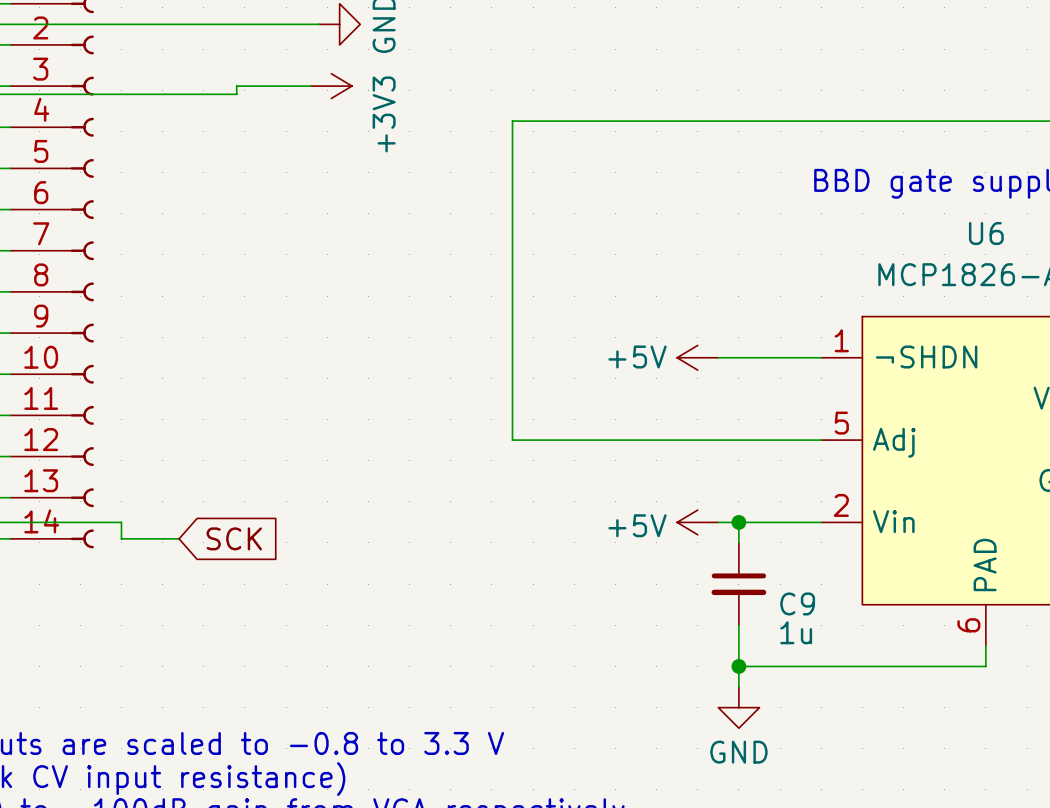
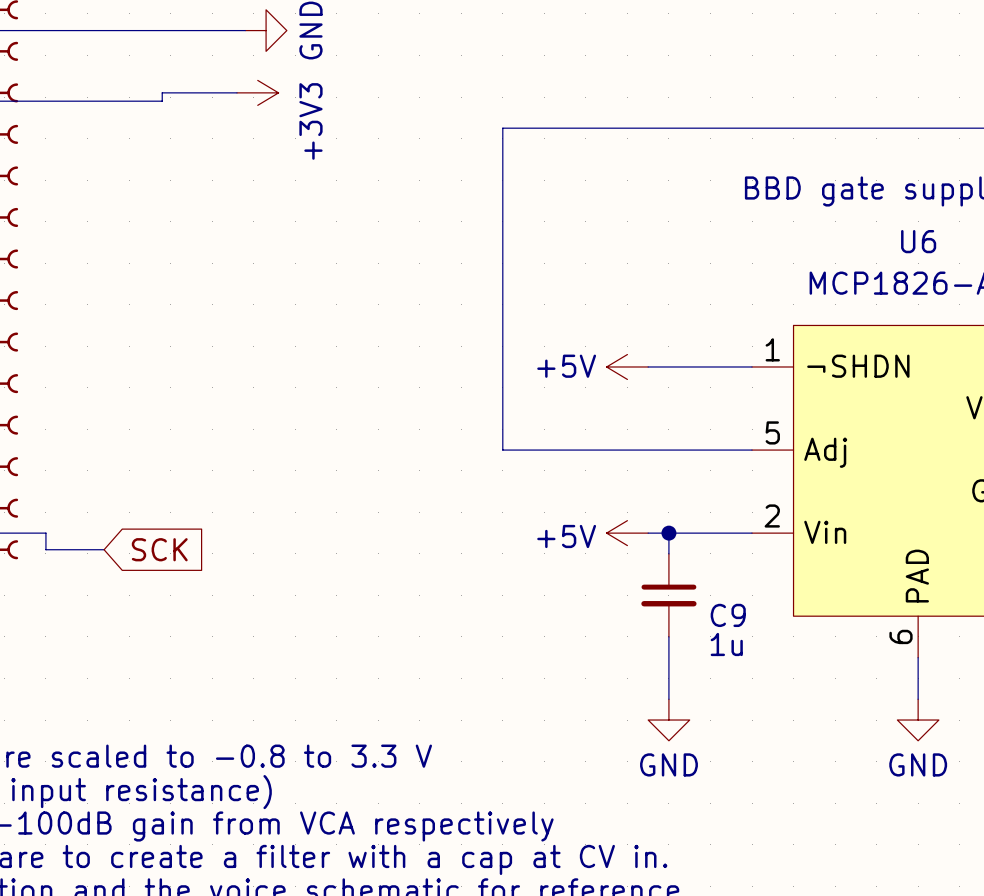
wire: (574, 121) (512, 121) (512, 440) (574, 440) -> (502, 128) (502, 450)
wire: (738, 666) (985, 666) -> (918, 699) (918, 678)
junction: (738, 666) -> none
power symbol: none -> GND (918, 720)

